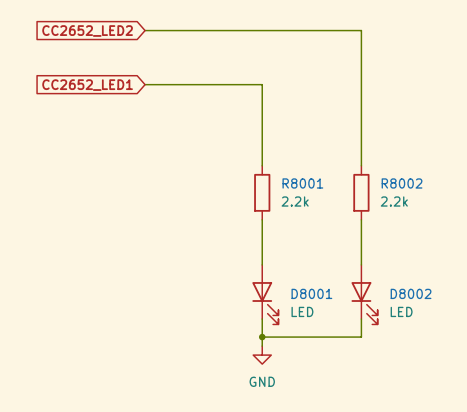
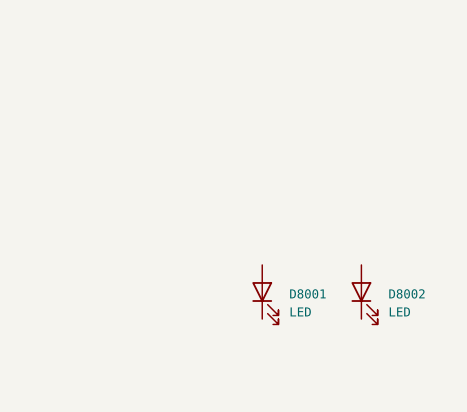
wire: (145, 30) (361, 30) (361, 165) -> none
global label: CC2652_LED2 (87, 31) -> none
wire: (145, 84) (262, 84) (262, 165) -> none
global label: CC2652_LED1 (87, 85) -> none
R8001: 2.2k (262, 192) -> none
R8002: 2.2k (361, 192) -> none
wire: (262, 219) (262, 264) -> none
wire: (361, 219) (361, 264) -> none
wire: (262, 319) (262, 346) -> none
wire: (361, 319) (361, 337) (262, 337) -> none
junction: (262, 337) -> none
power symbol: GND (262, 355) -> none

